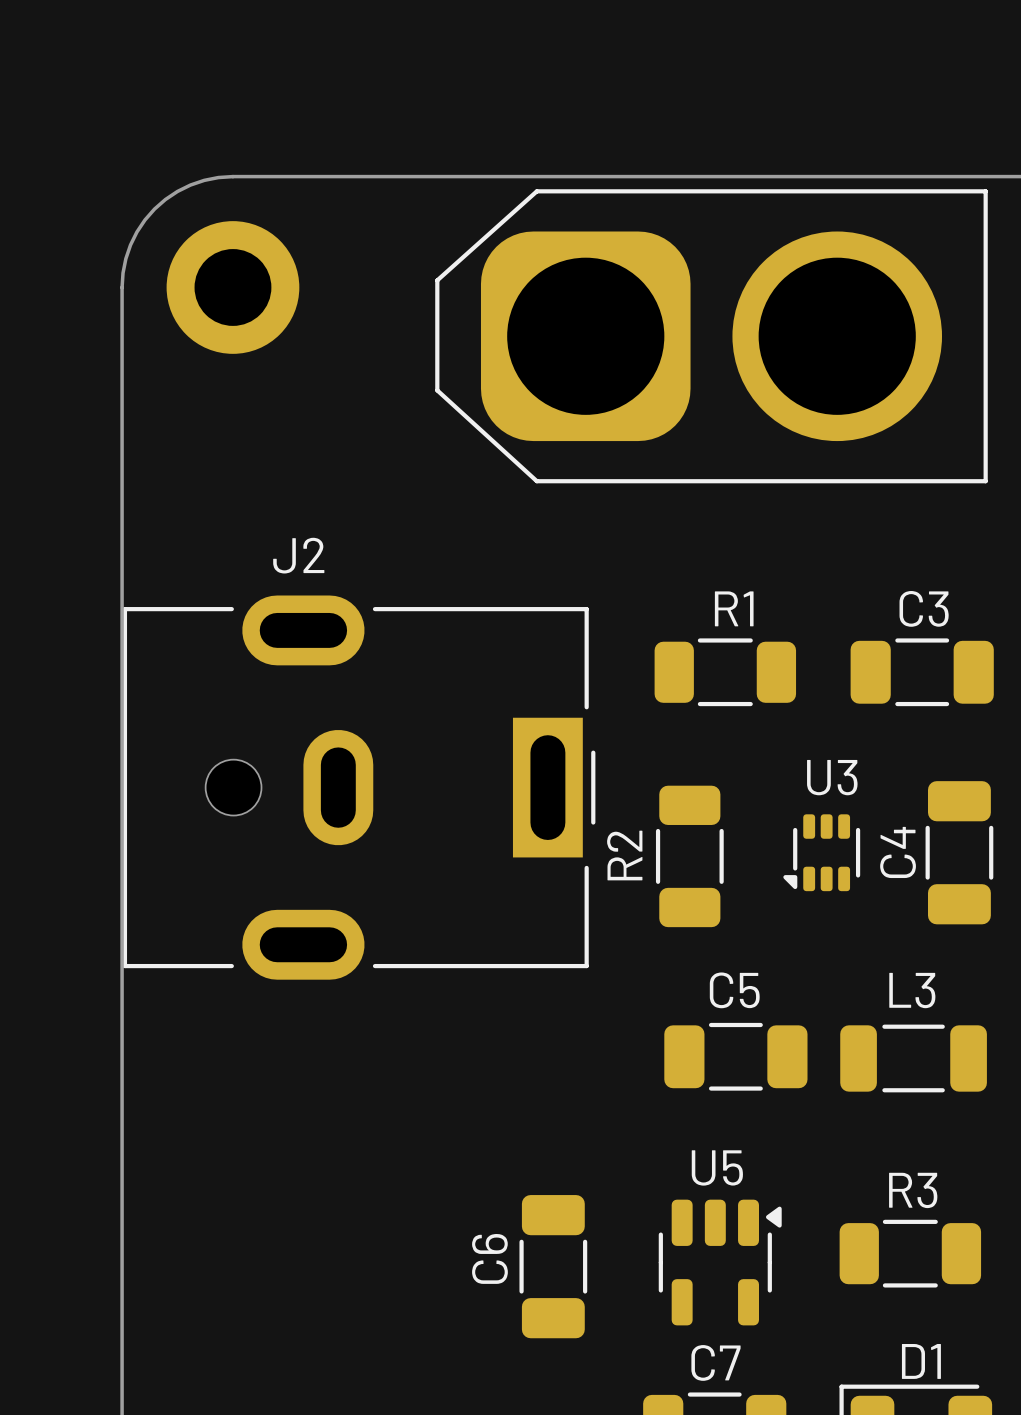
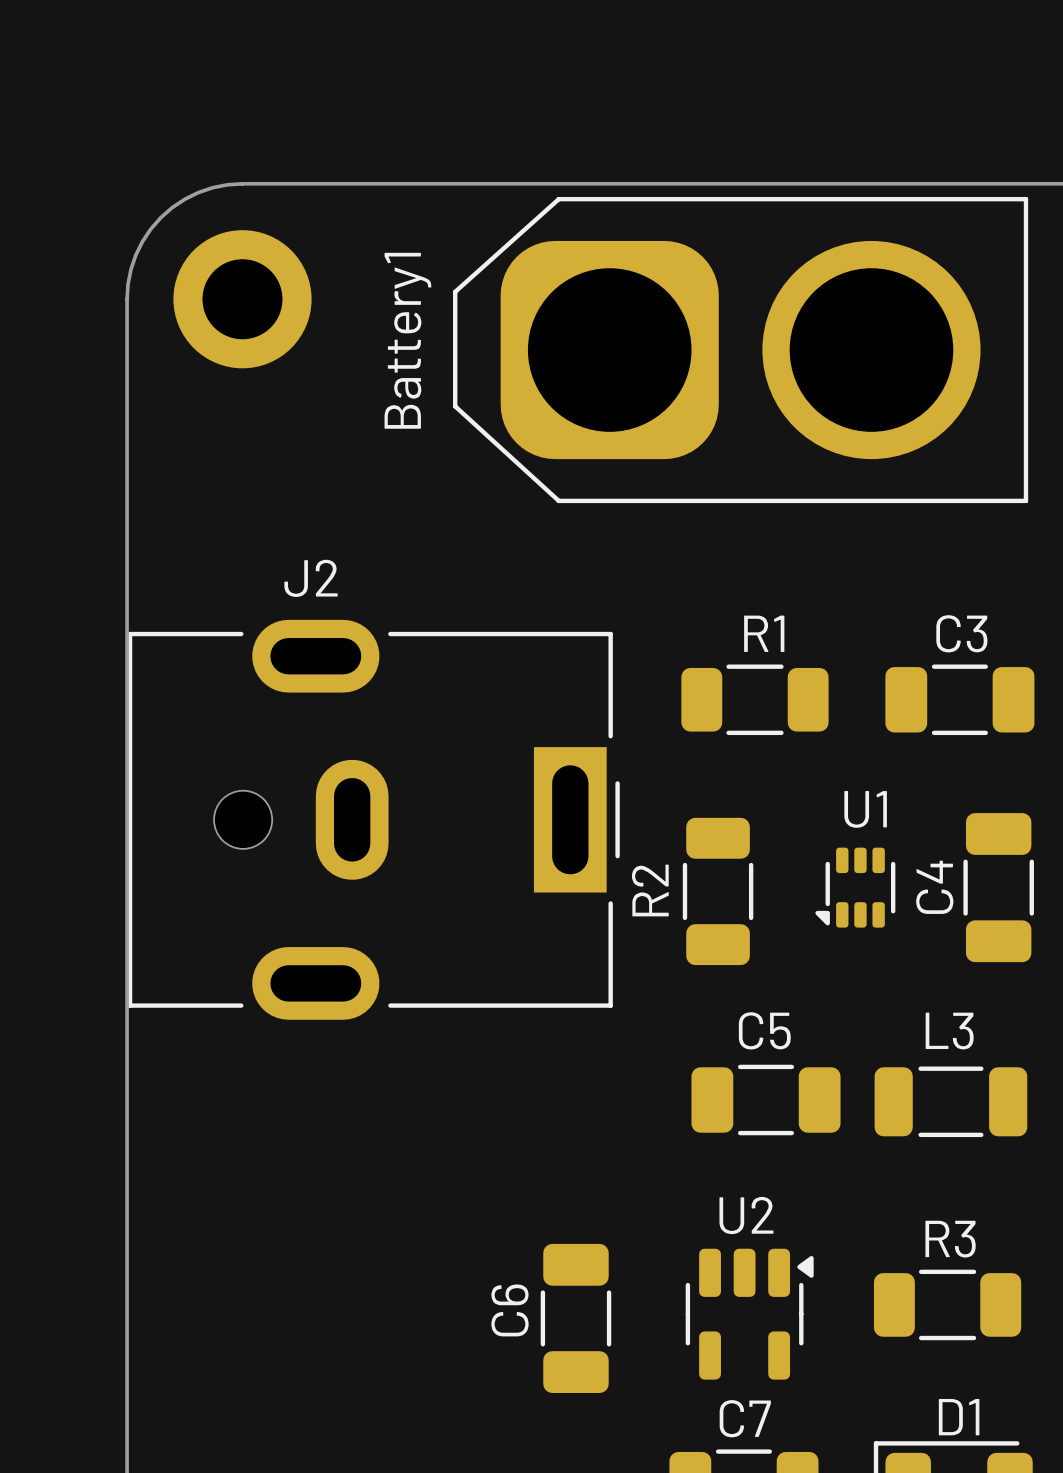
Battery1 name: none -> Battery1 (407, 340)
U3 name: U3 (832, 777) -> U1 (865, 809)
U5 name: U5 (717, 1167) -> U2 (746, 1215)

